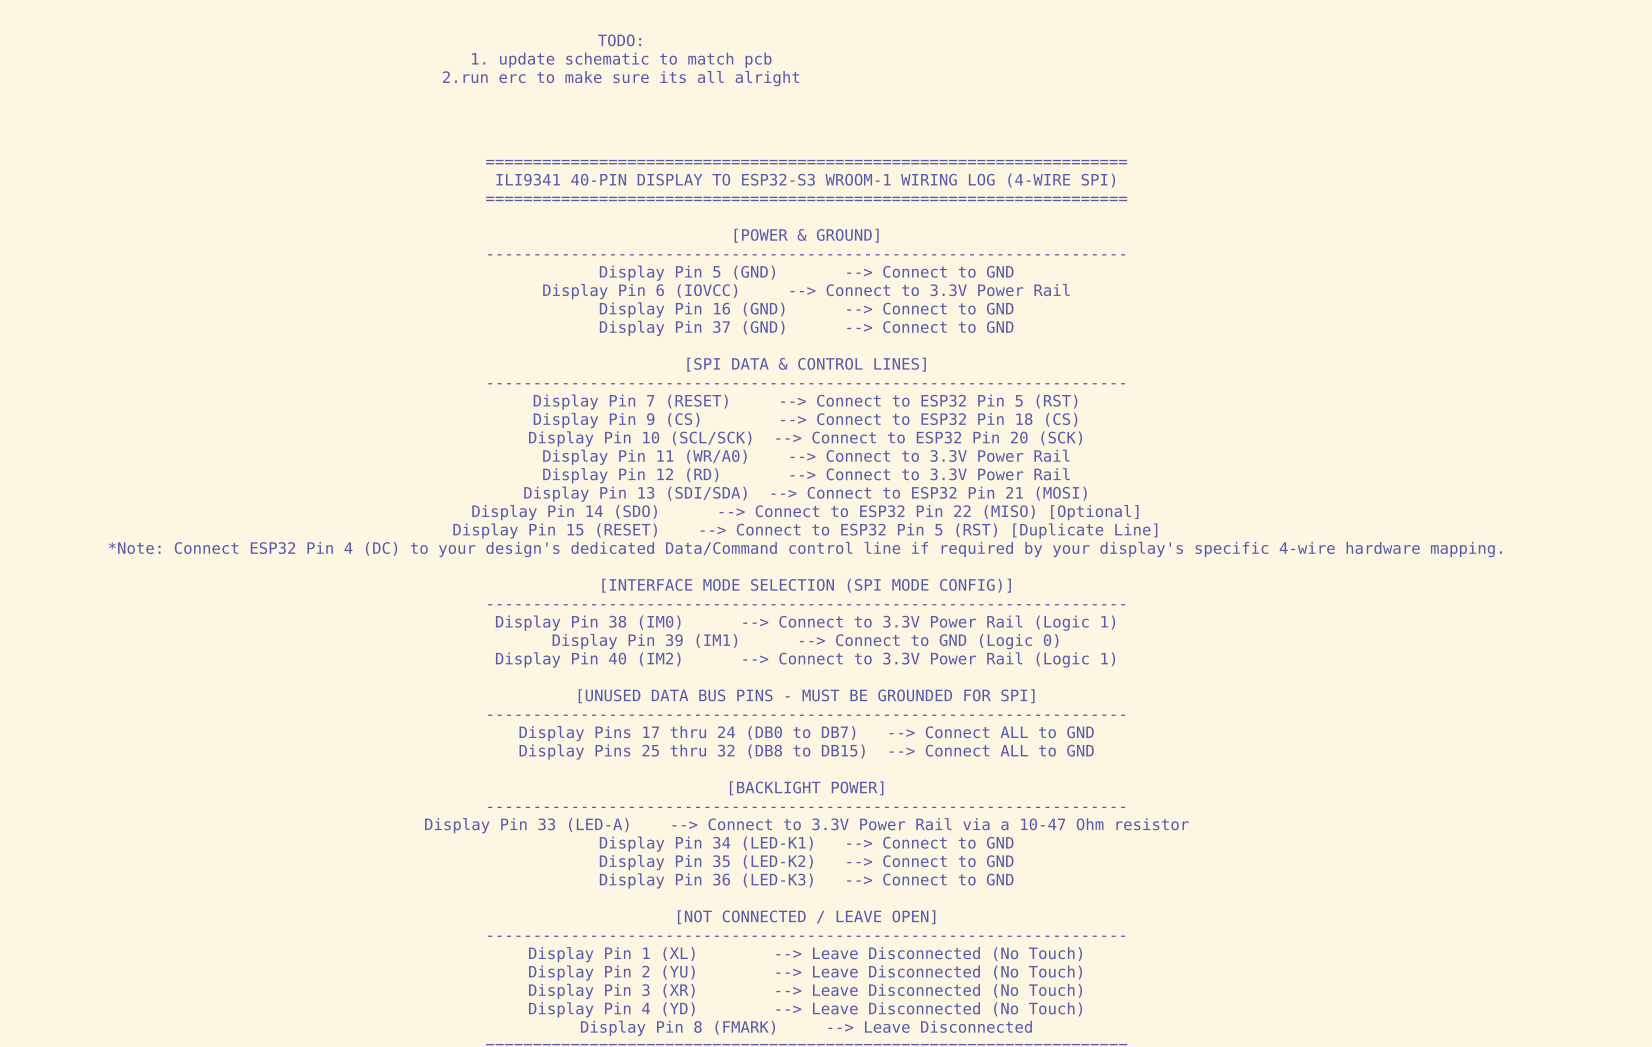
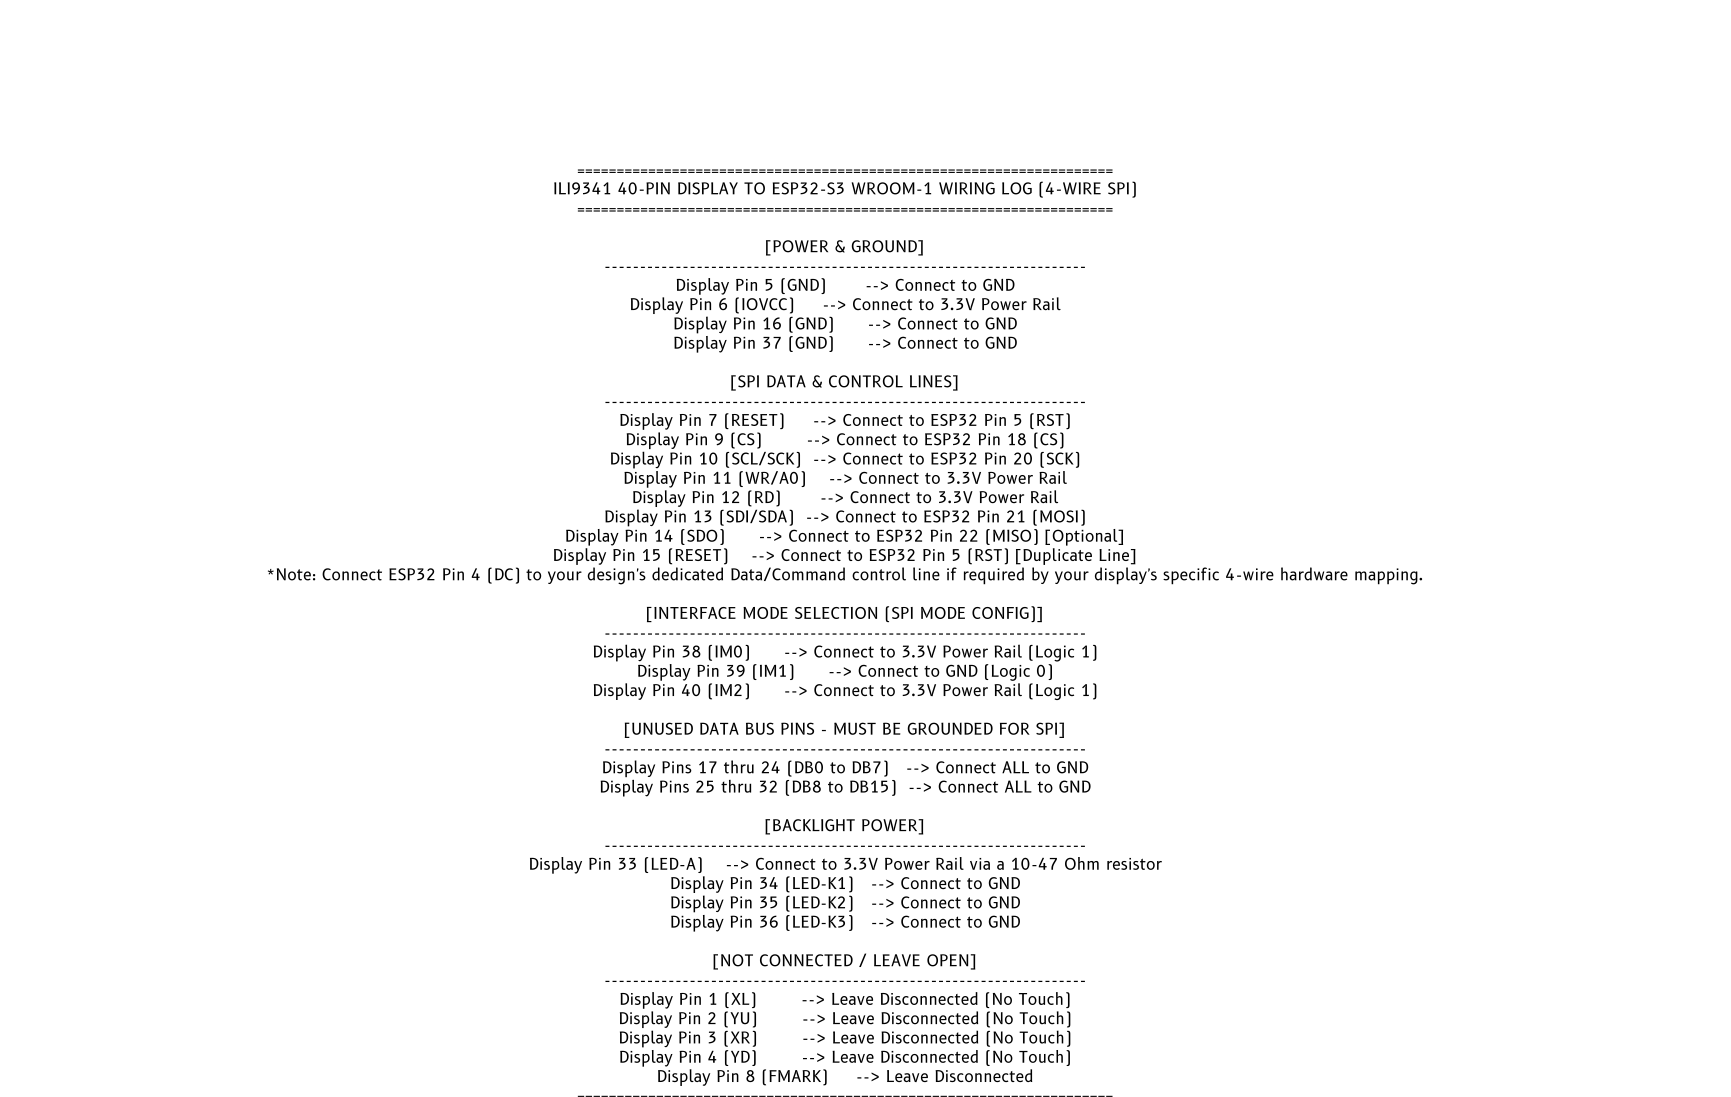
text: TODO: (619, 40) -> none
text: 1. update schematic to match pcb (621, 60) -> none
text: 2.run erc to make sure its all alright (621, 78) -> none

